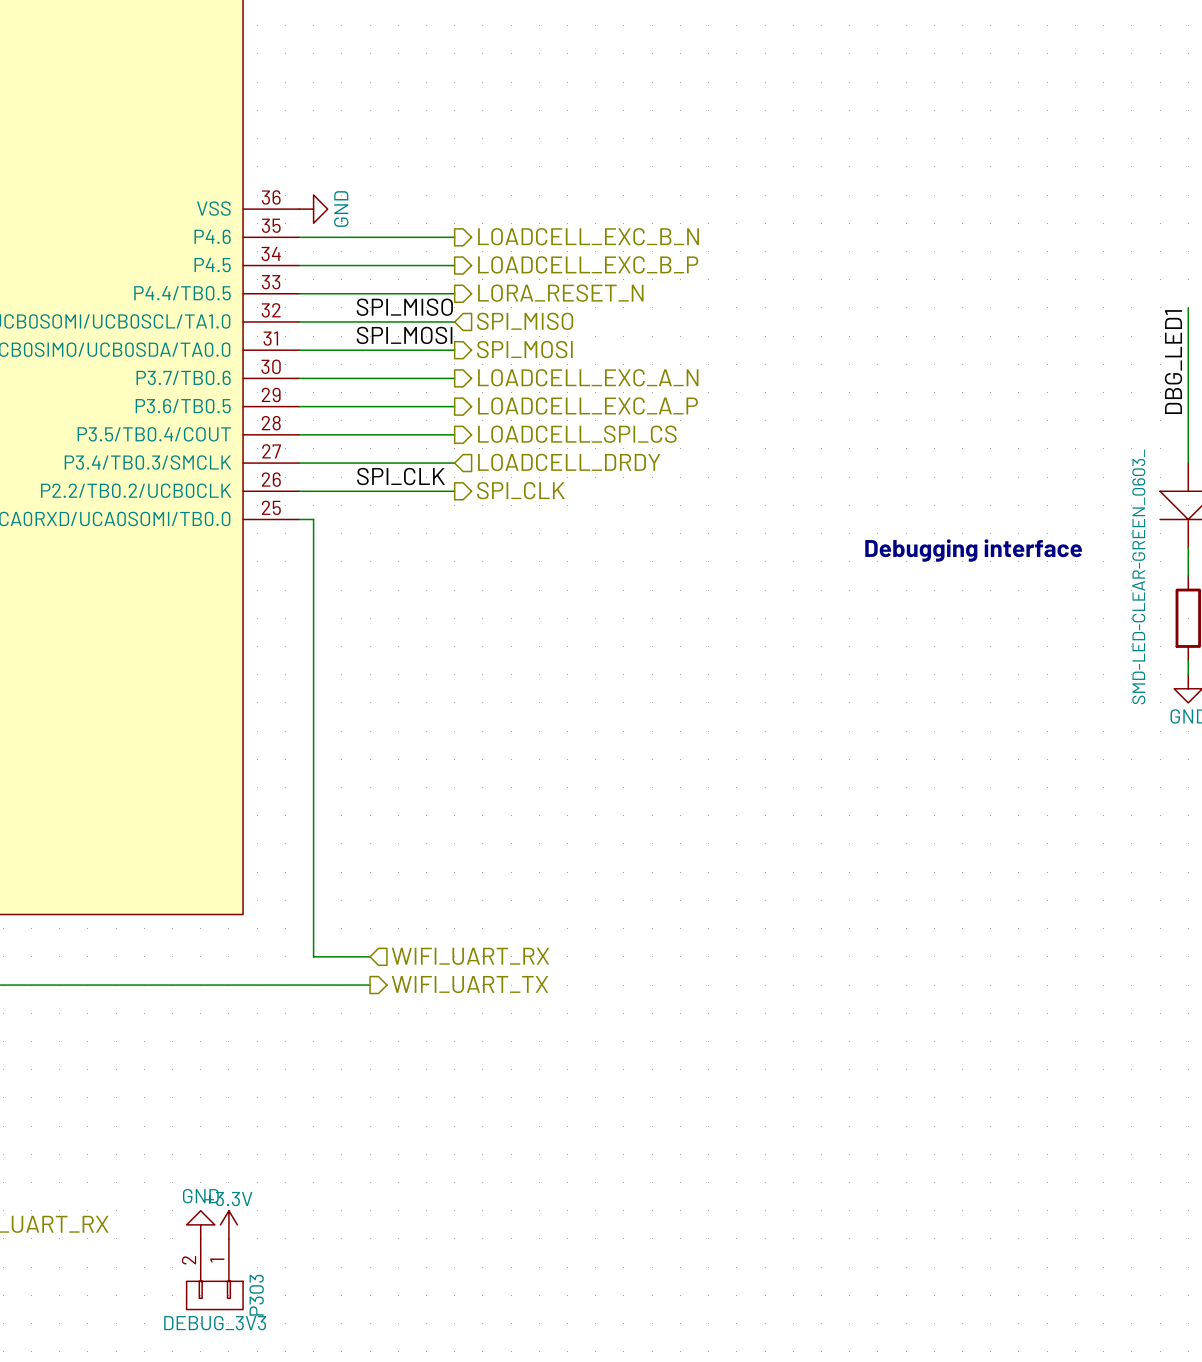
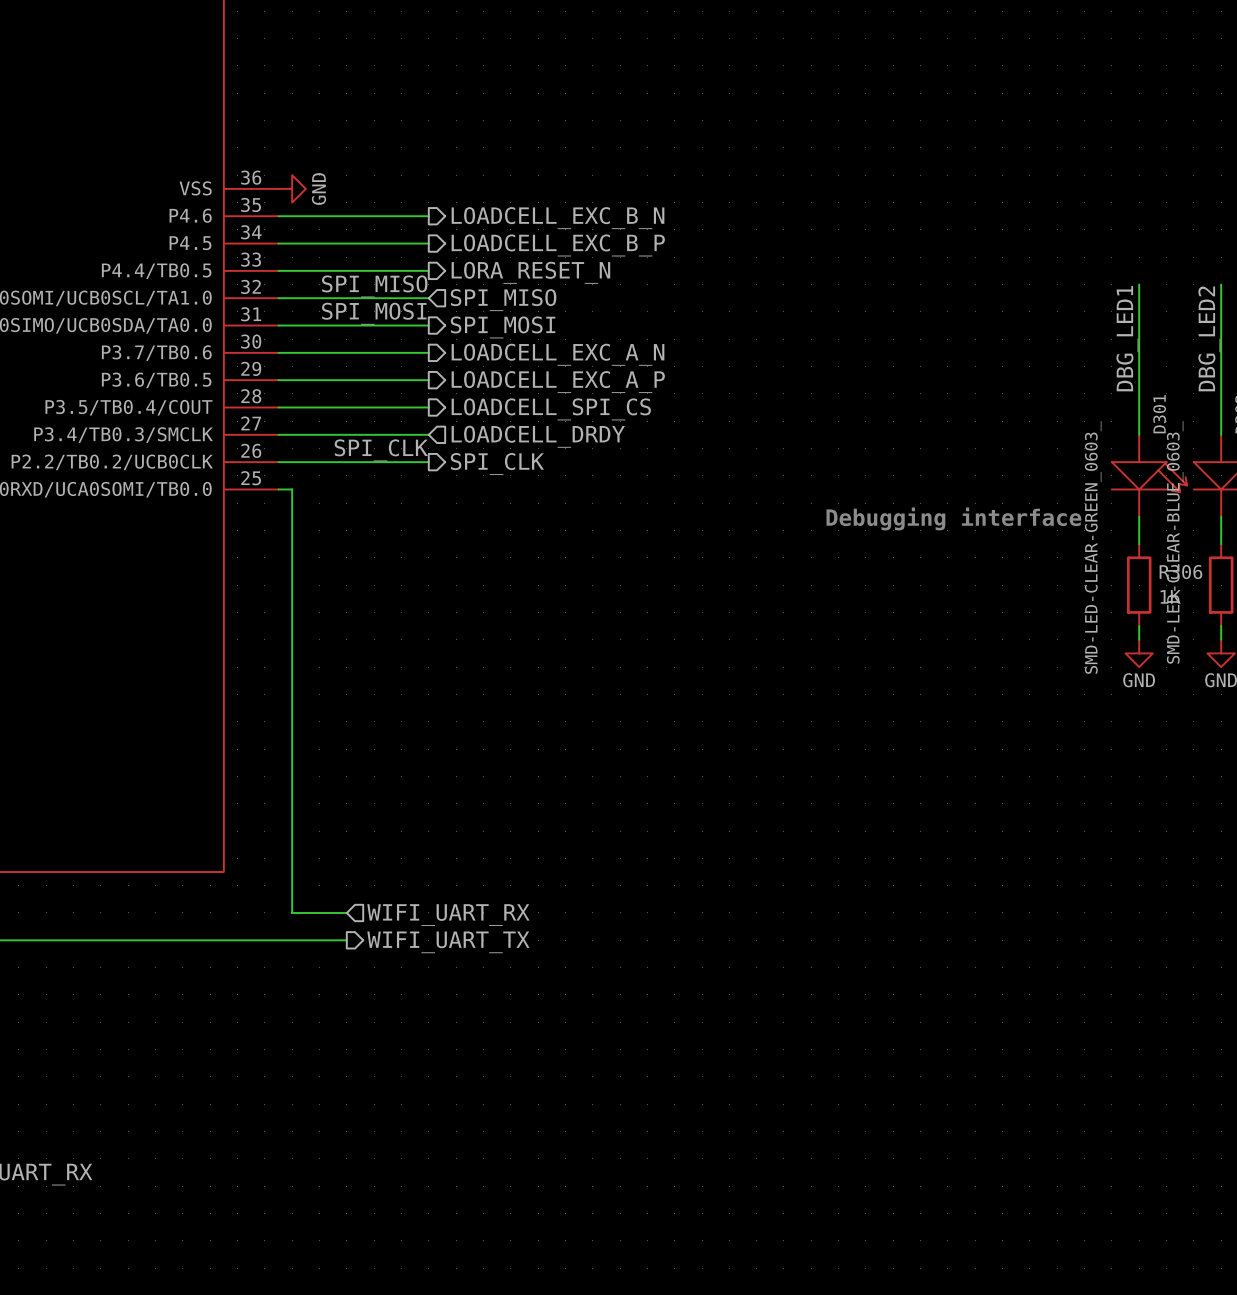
power symbol: GND (200, 1224) -> none
power symbol: +3.3V (228, 1224) -> none
P303: DEBUG_3V3 (214, 1274) -> none

